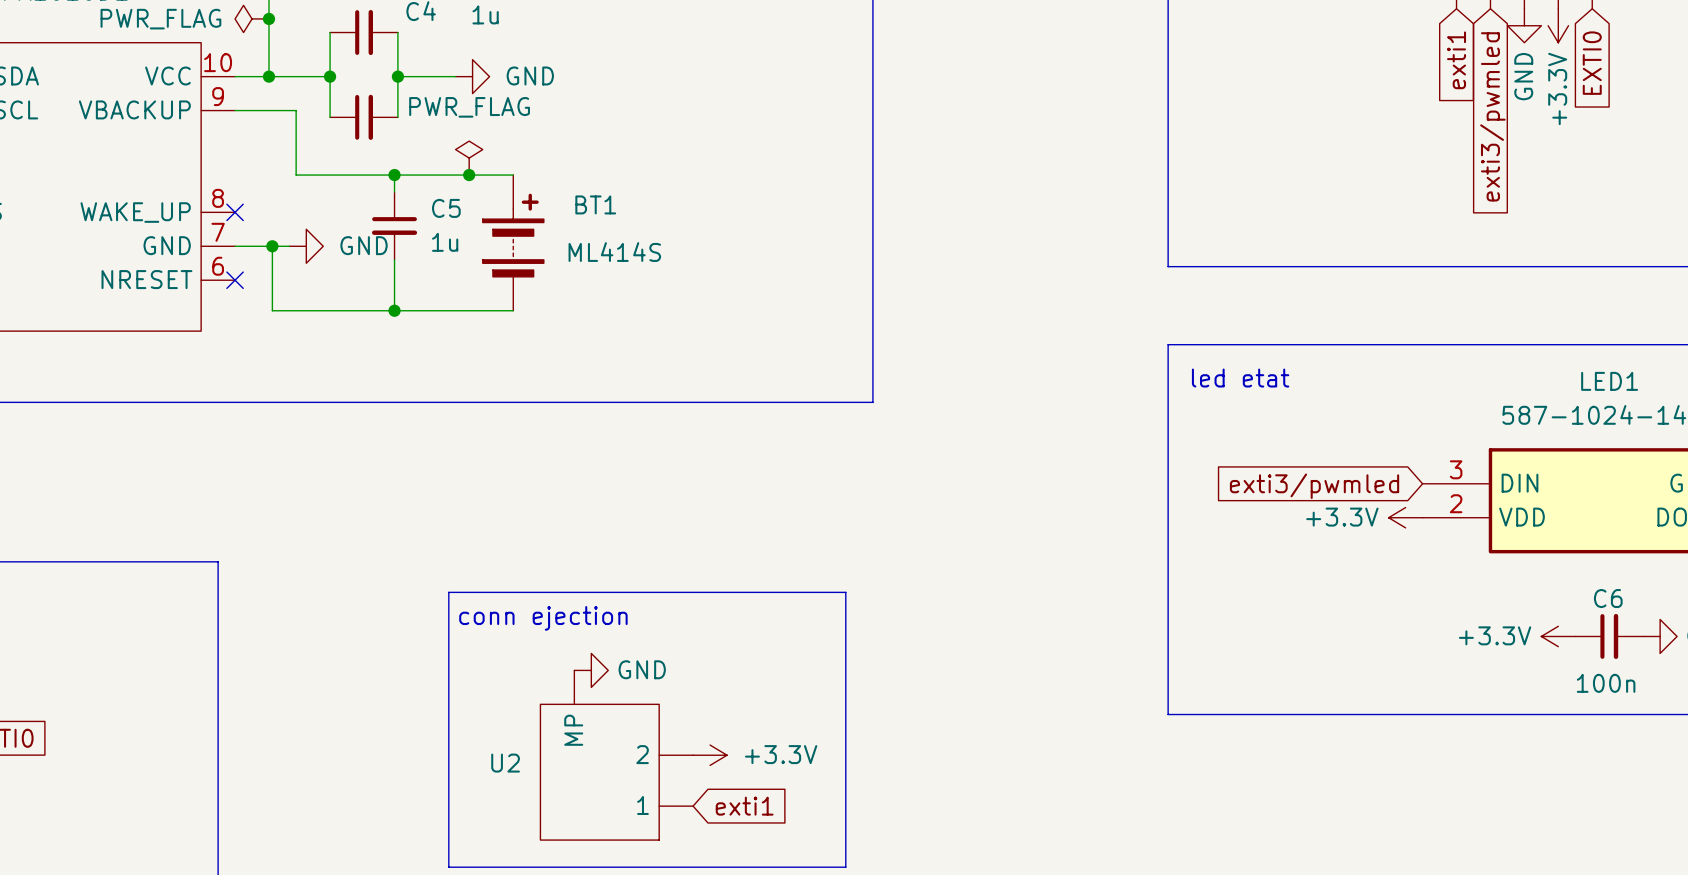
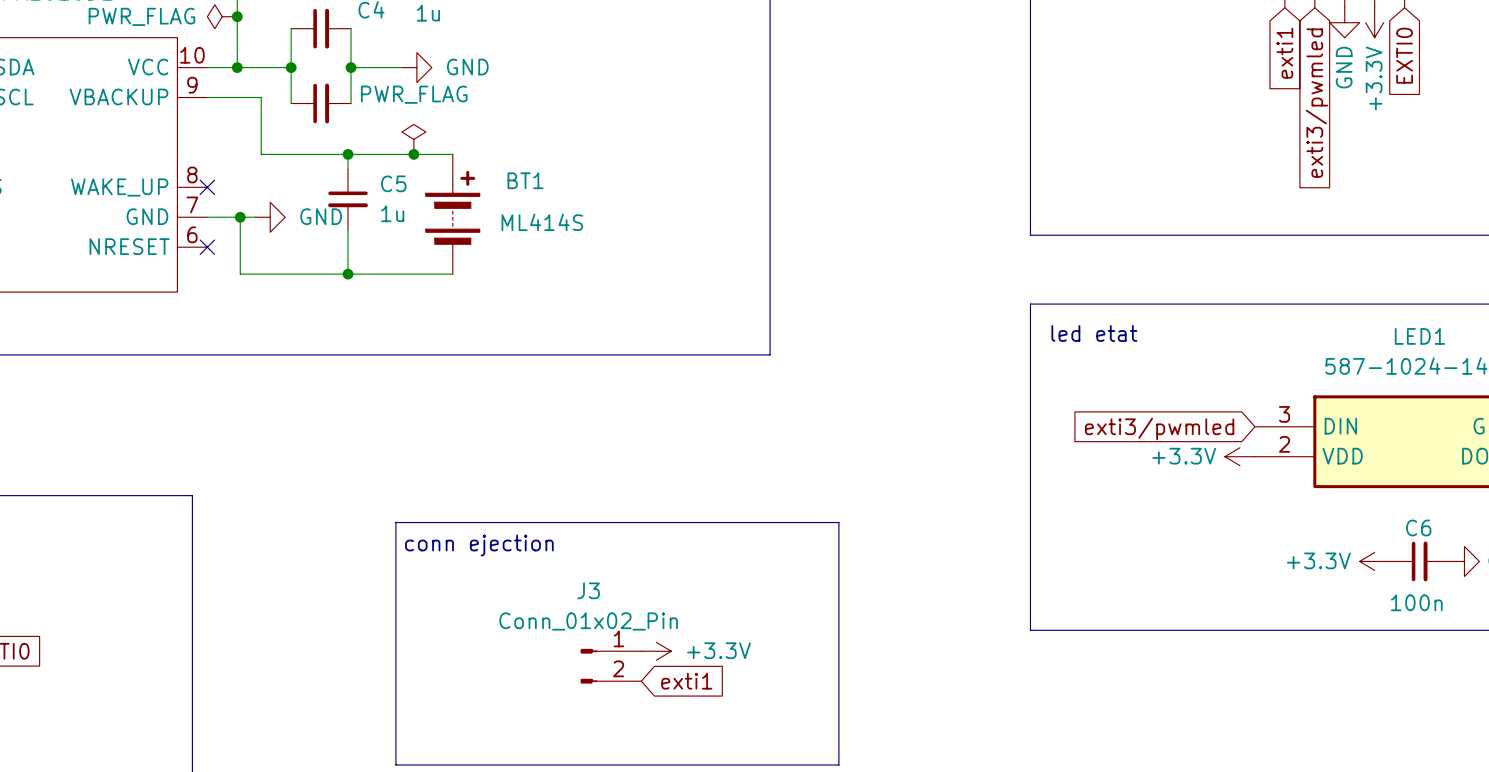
line: (845, 592) (845, 867) -> (746, 522) (838, 522) (838, 765) (746, 765)
power symbol: GND (591, 670) -> none
U2: (616, 755) -> none
J3: none -> Conn_01x02_Pin (610, 666)
power symbol position: +3.3V (710, 755) -> +3.3V (656, 651)
global label position: exti1 (744, 806) -> exti1 (686, 681)

